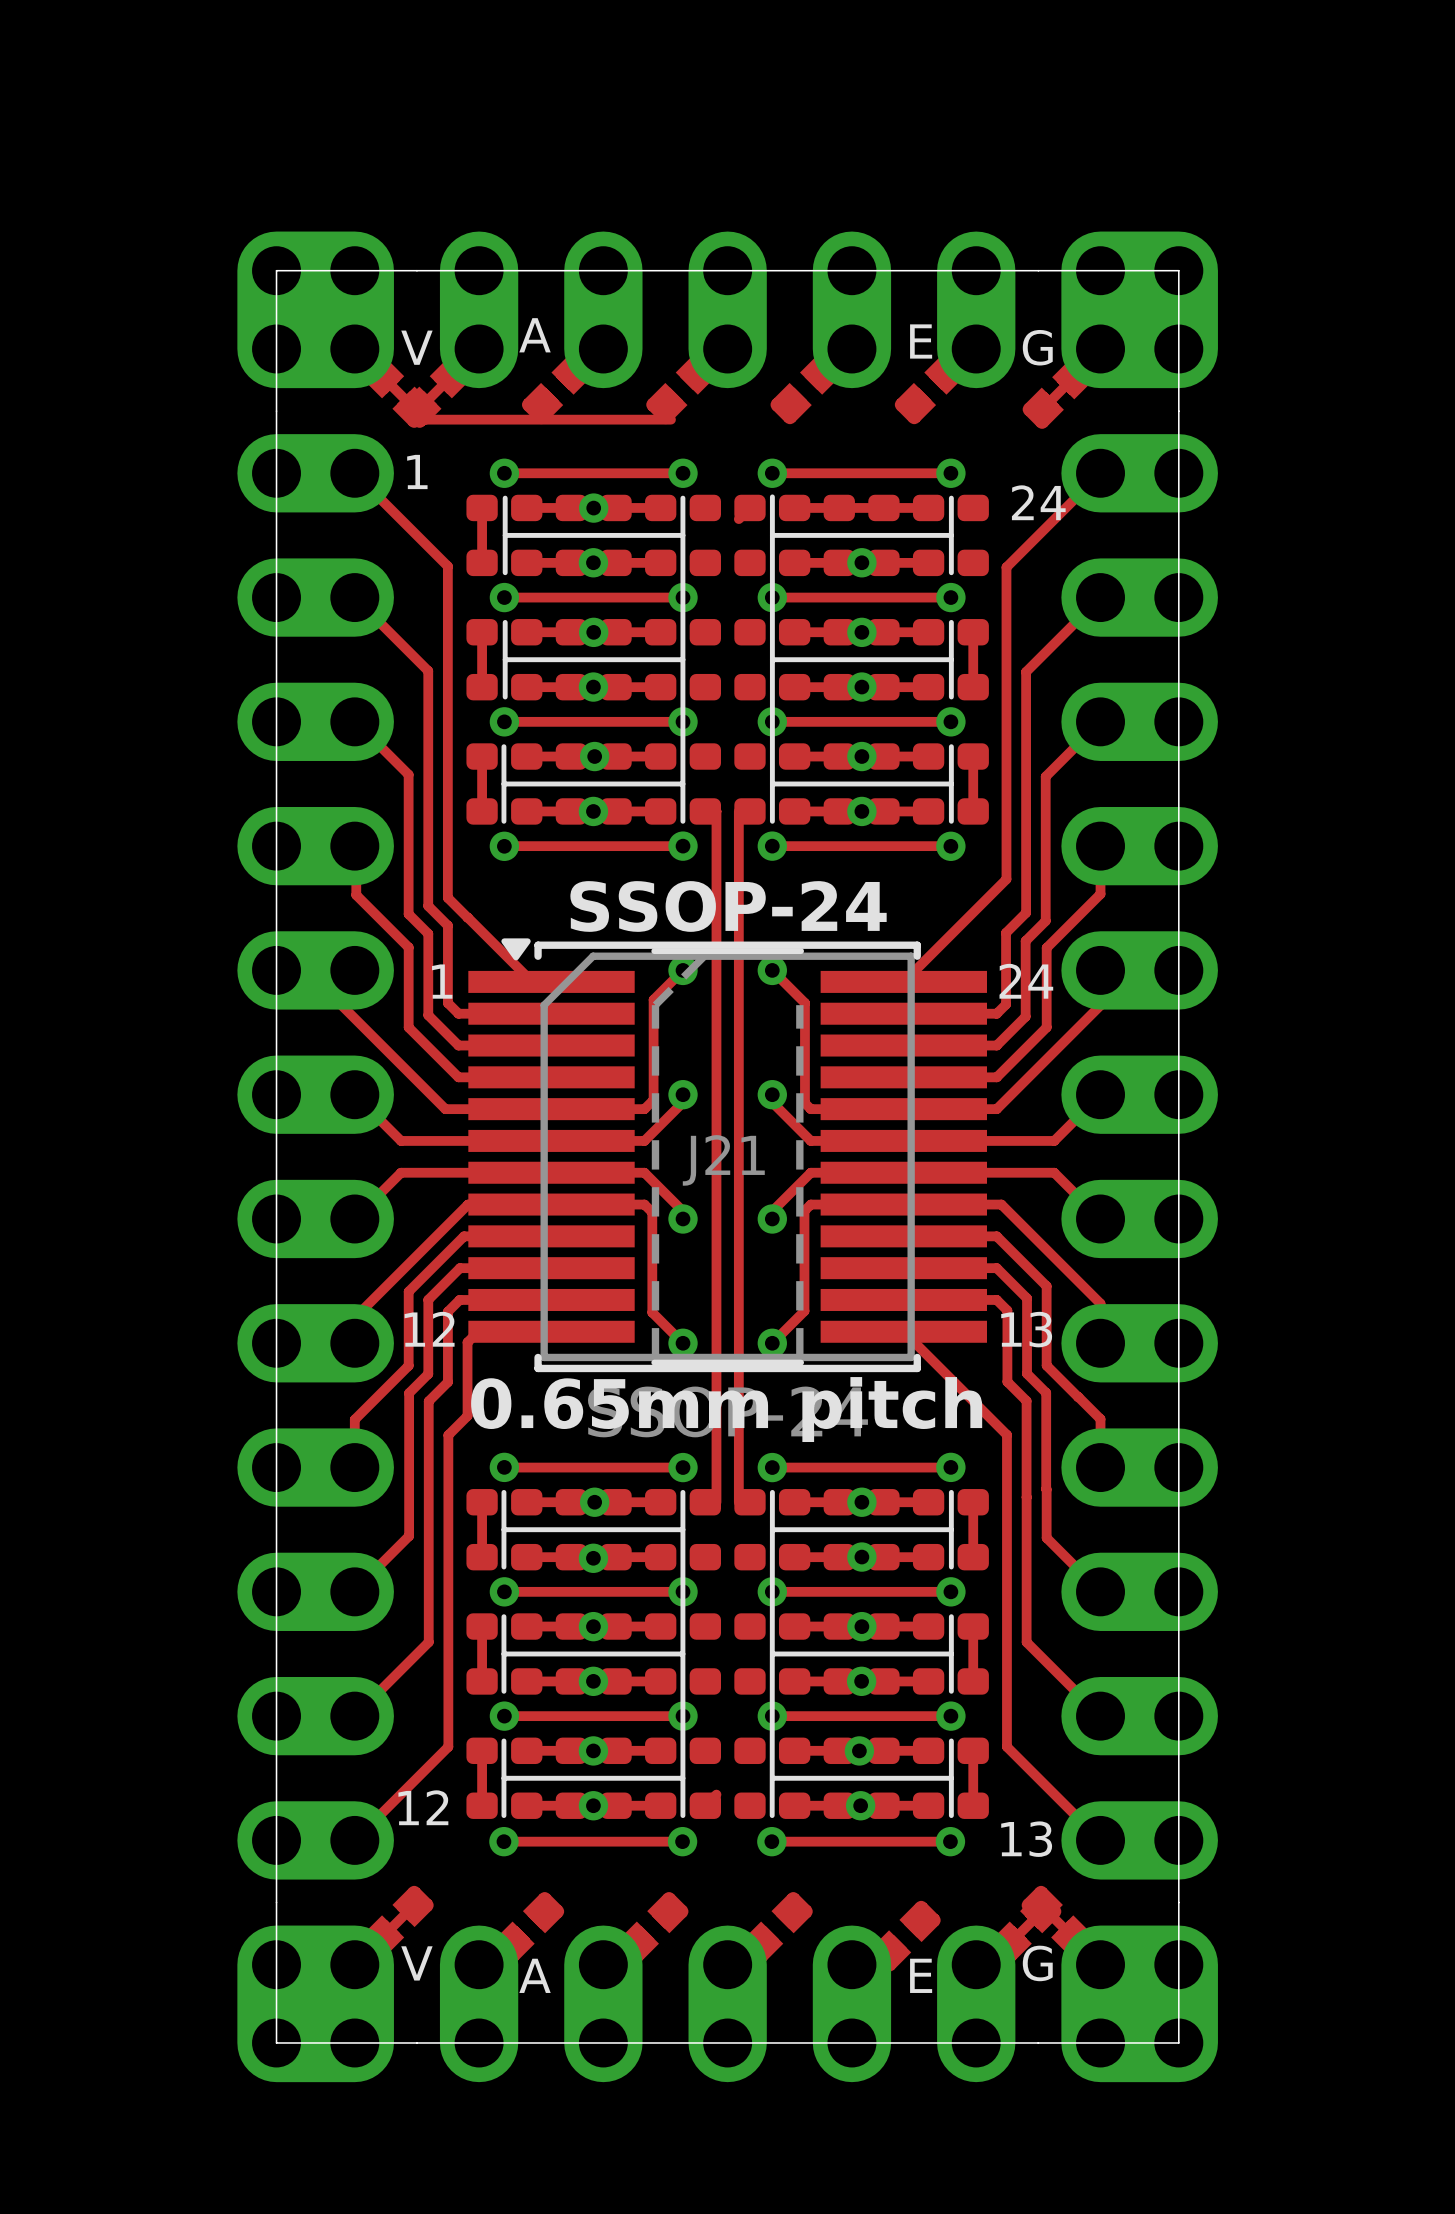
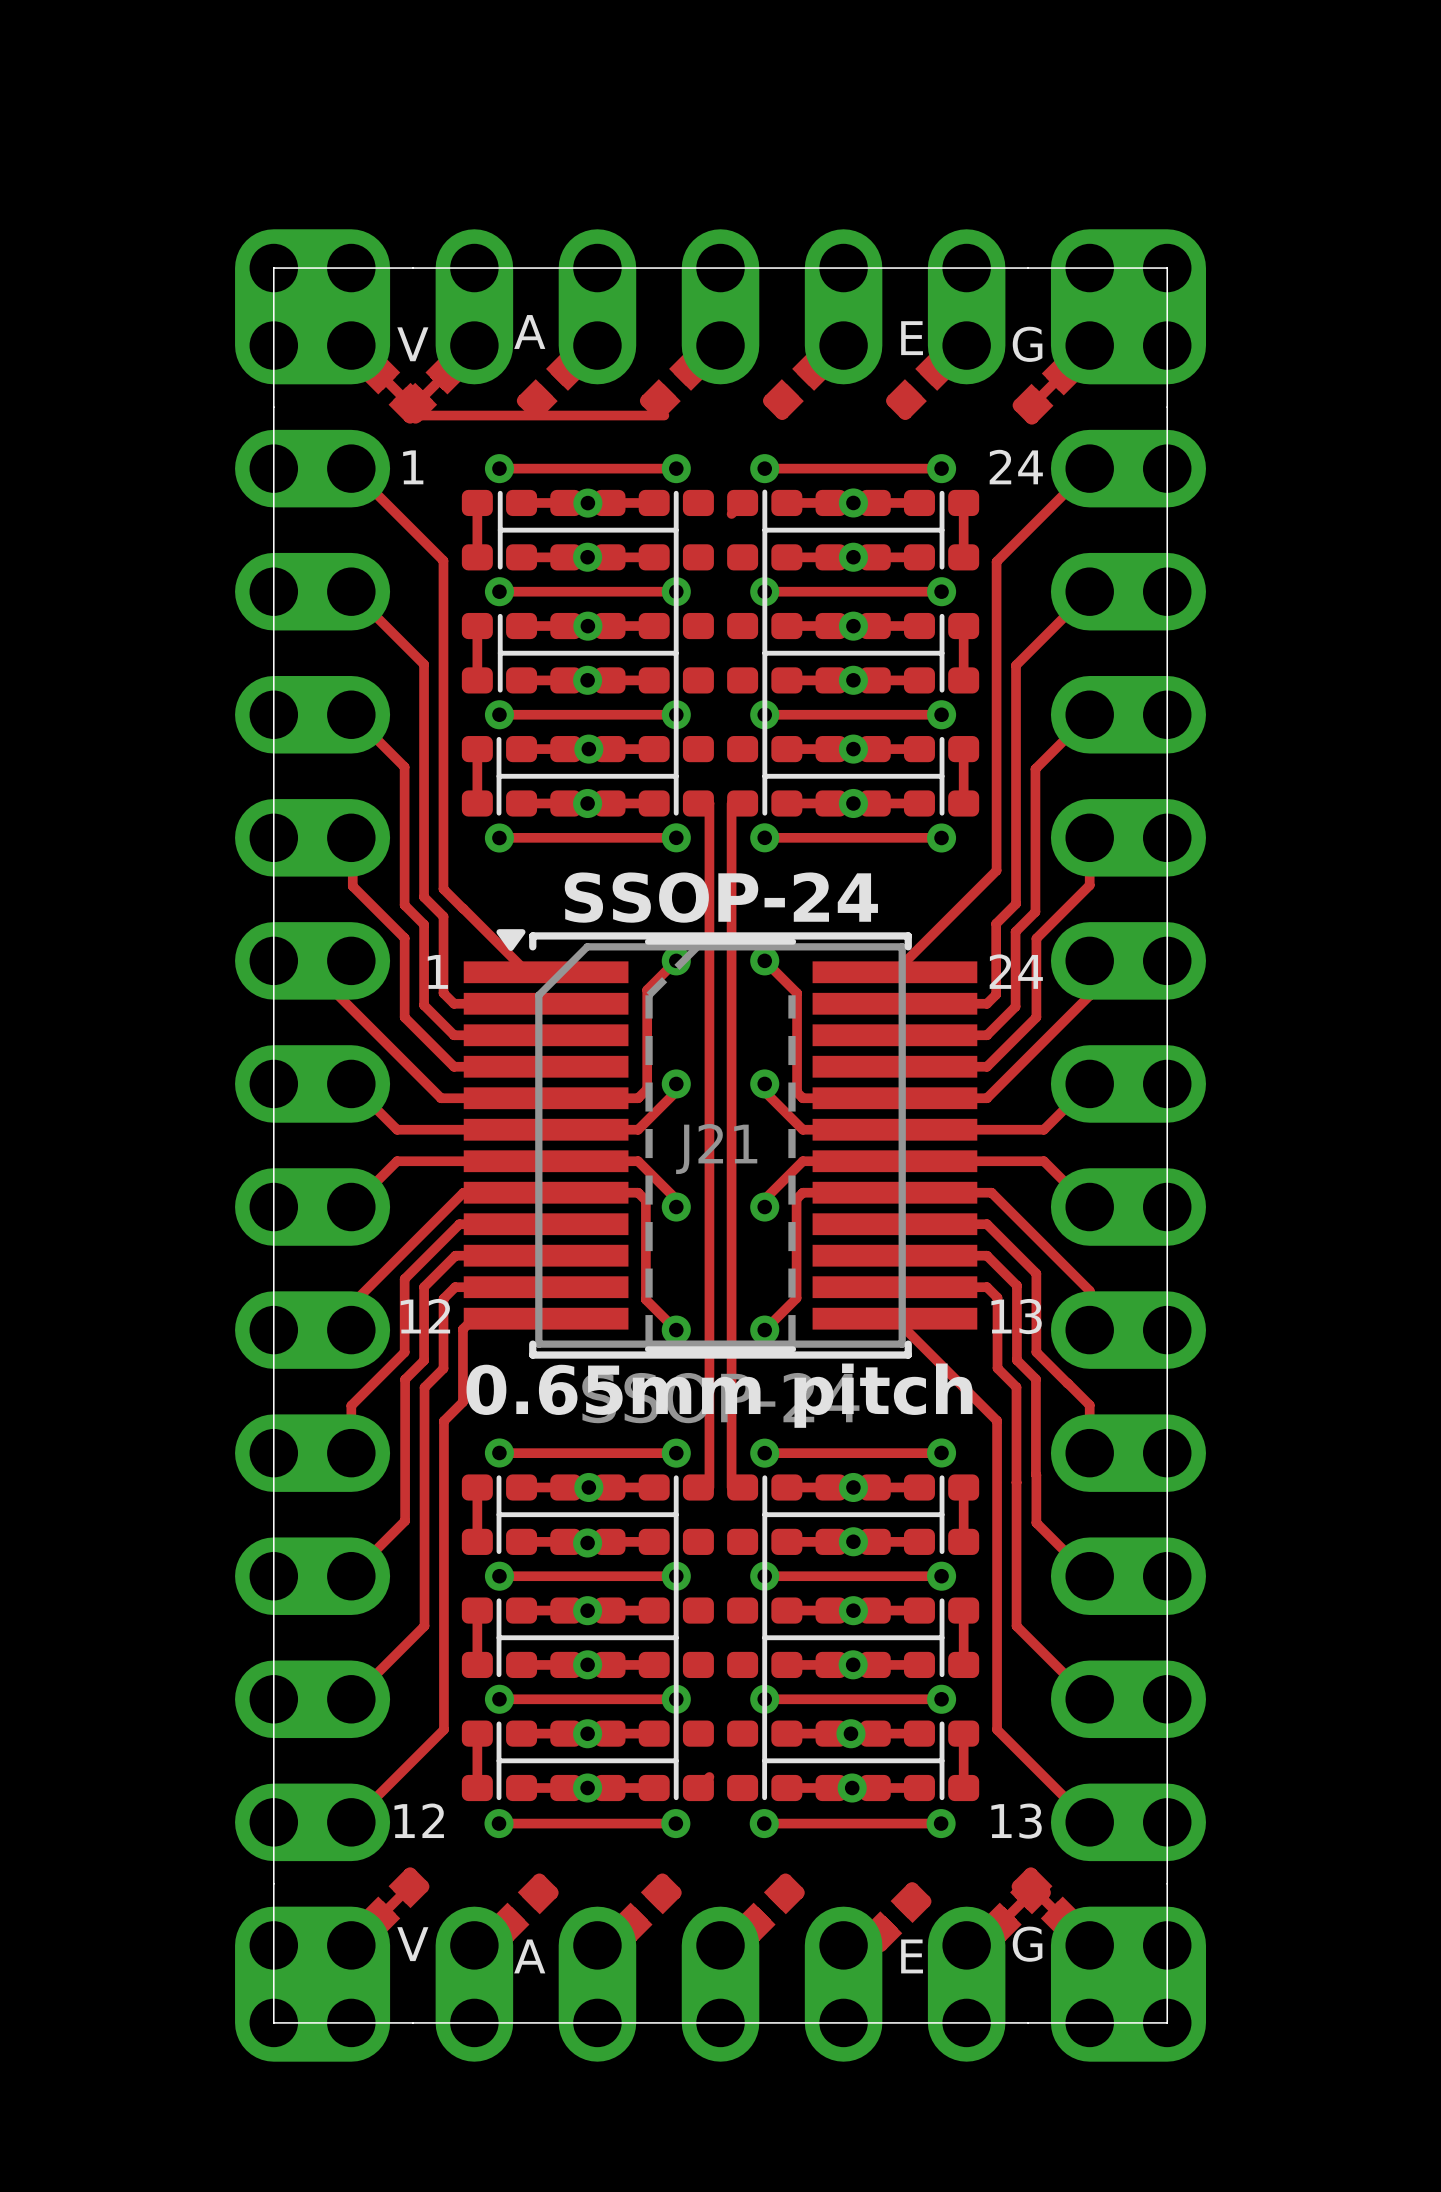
text position: 24 (1038, 502) -> 24 (1016, 467)
via: none -> (853, 502)
track: none -> (963, 502) (963, 557)
text position: 12 (423, 1807) -> 12 (419, 1820)

